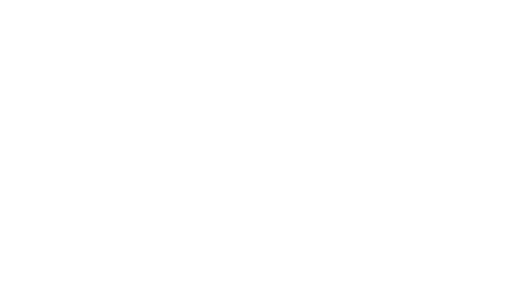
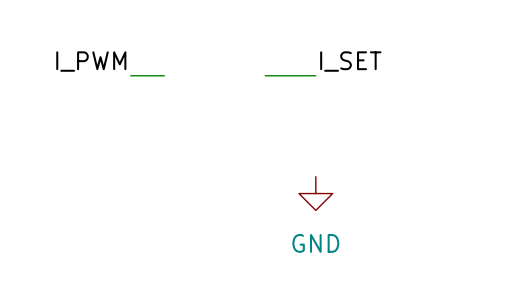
label: none -> I_PWM (91, 61)
label: none -> I_SET (350, 61)
wire: none -> (130, 75) (164, 75)
wire: none -> (265, 75) (315, 75)
power symbol: none -> GND (315, 193)

